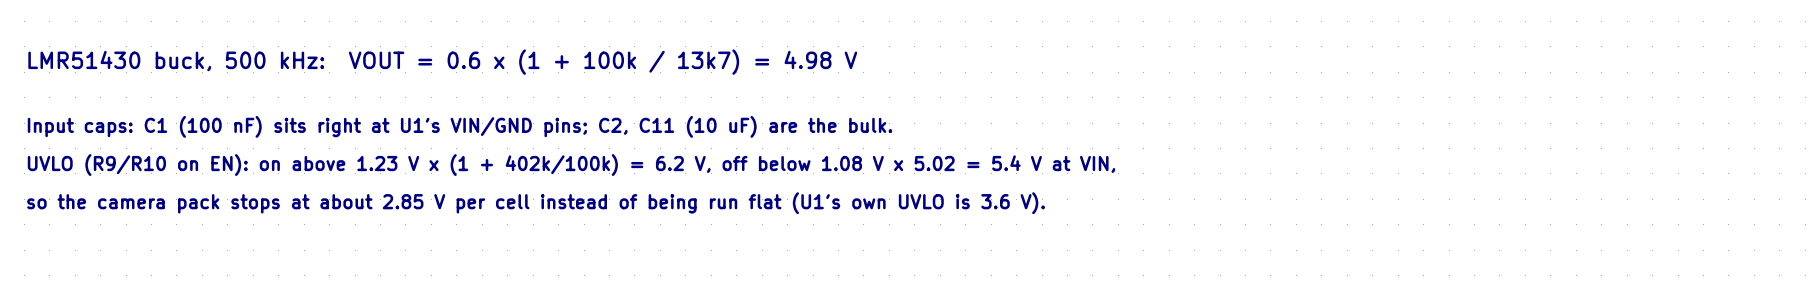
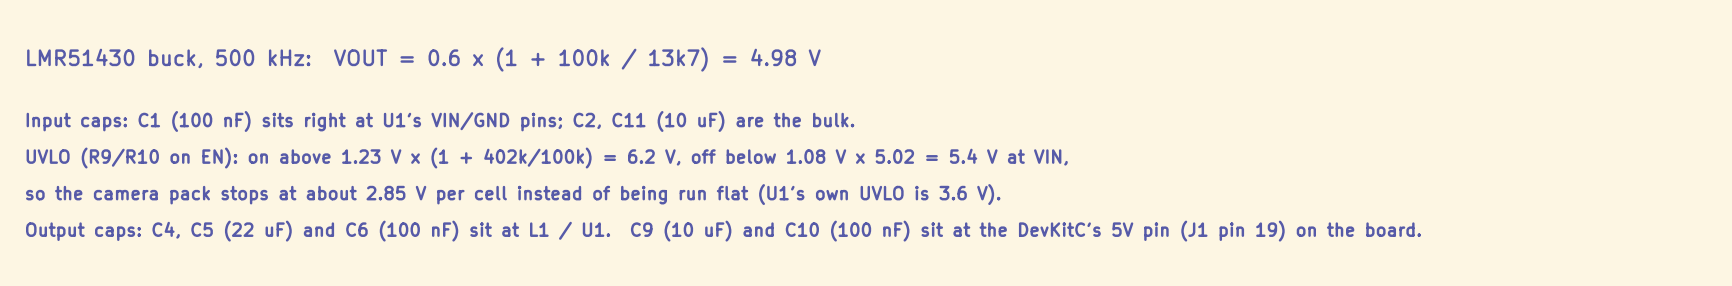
text: none -> Output caps: C4, C5 (22 uF) and C6 (100 nF) sit at L1 / U1. C9 (10 uF) and C10 (100 nF) sit at the DevKitC's 5V pin (J1 pin 19) on the board. (723, 231)

